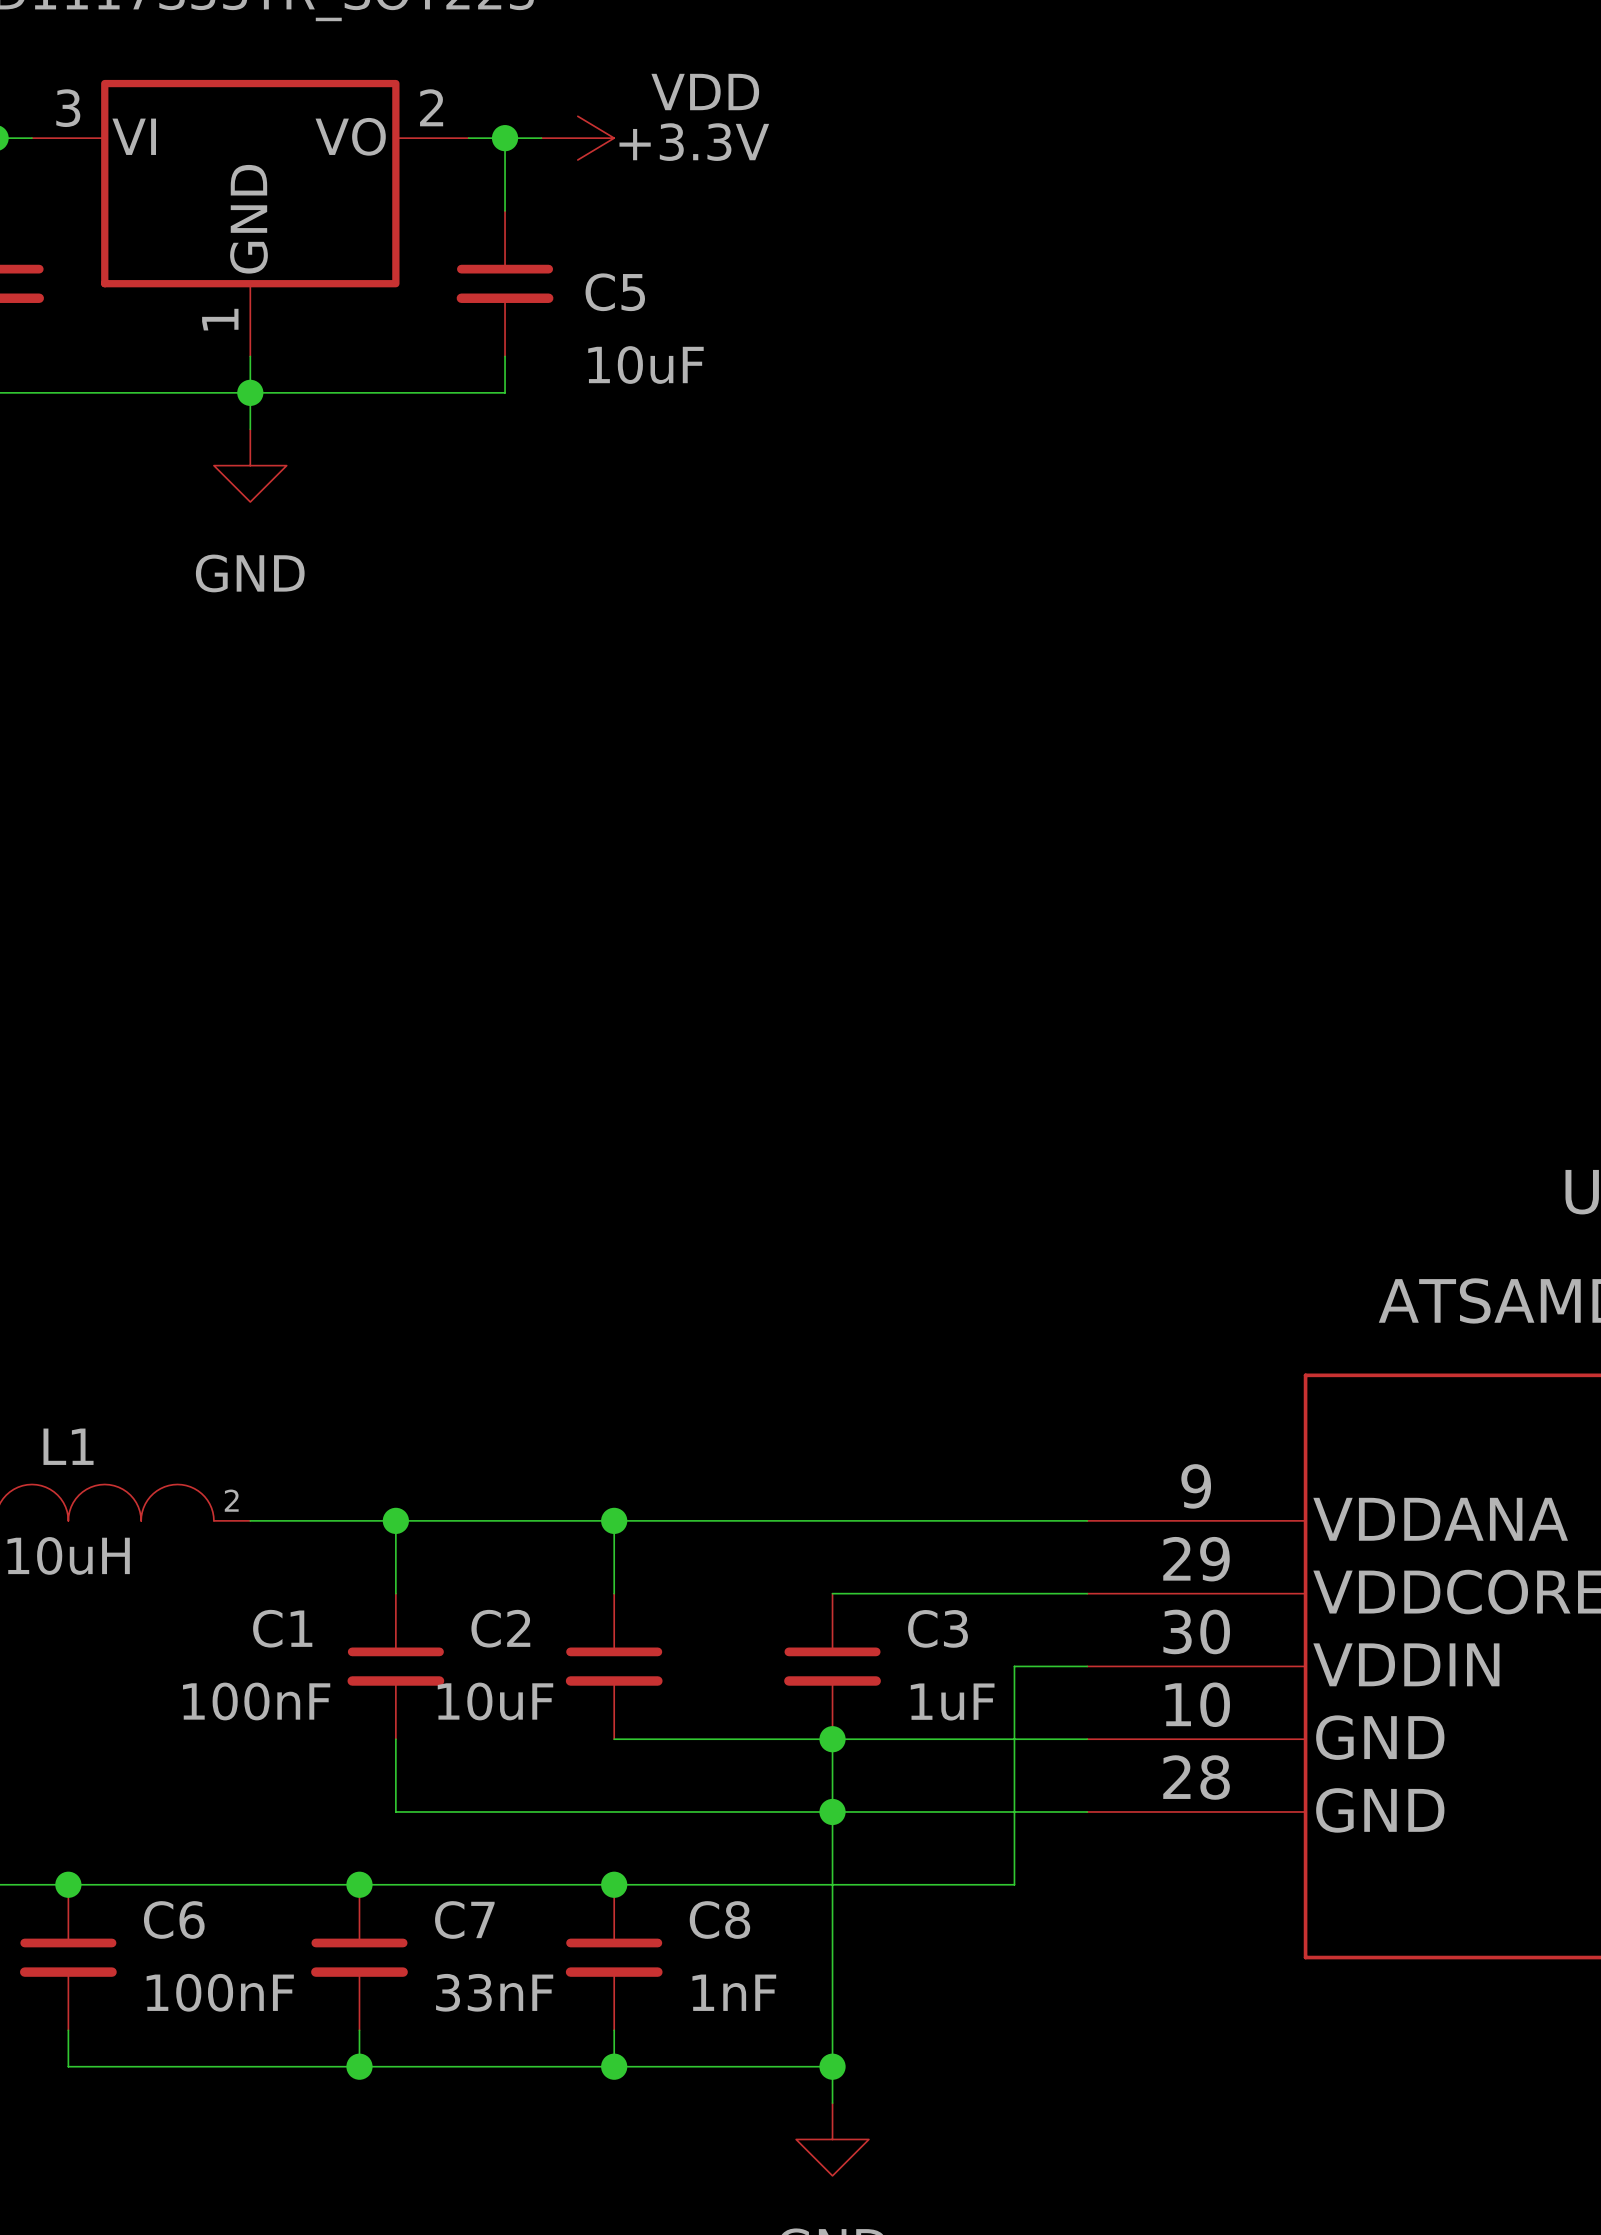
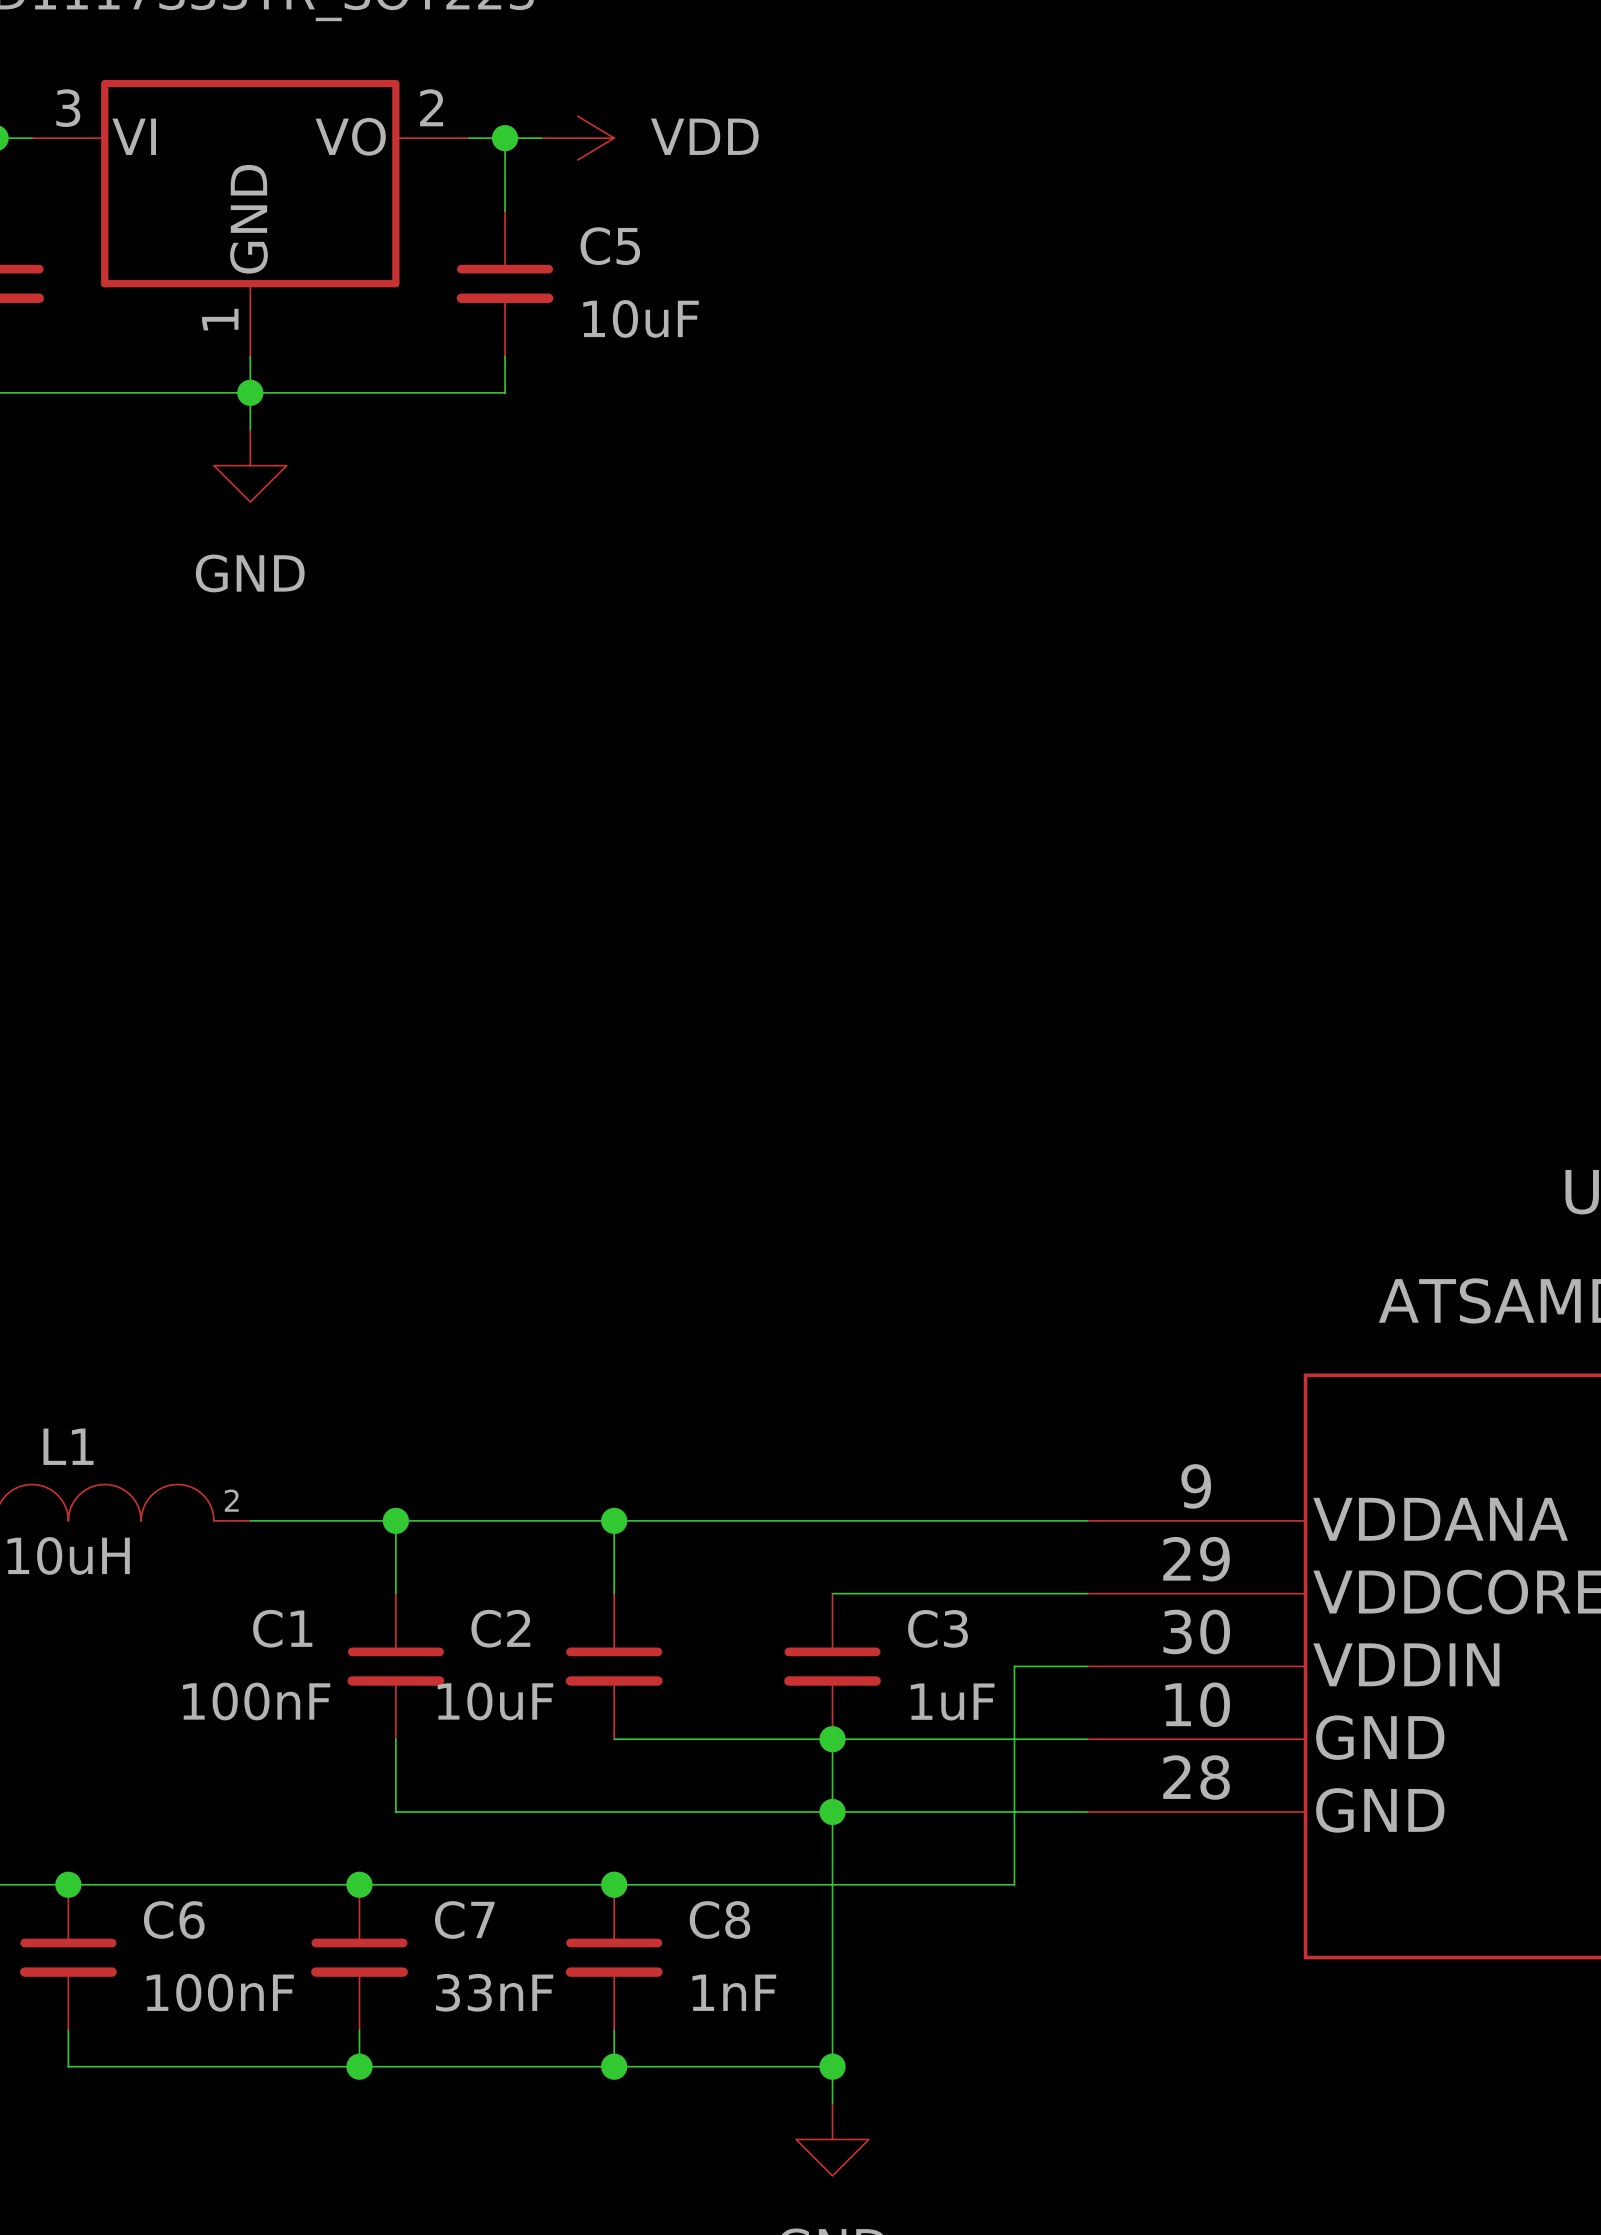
power symbol text position: VDD (705, 92) -> VDD (704, 136)
label: +3.3V (694, 142) -> none
C5 name position: C5 (615, 292) -> C5 (610, 246)
C5 value position: 10uF (645, 365) -> 10uF (641, 318)

